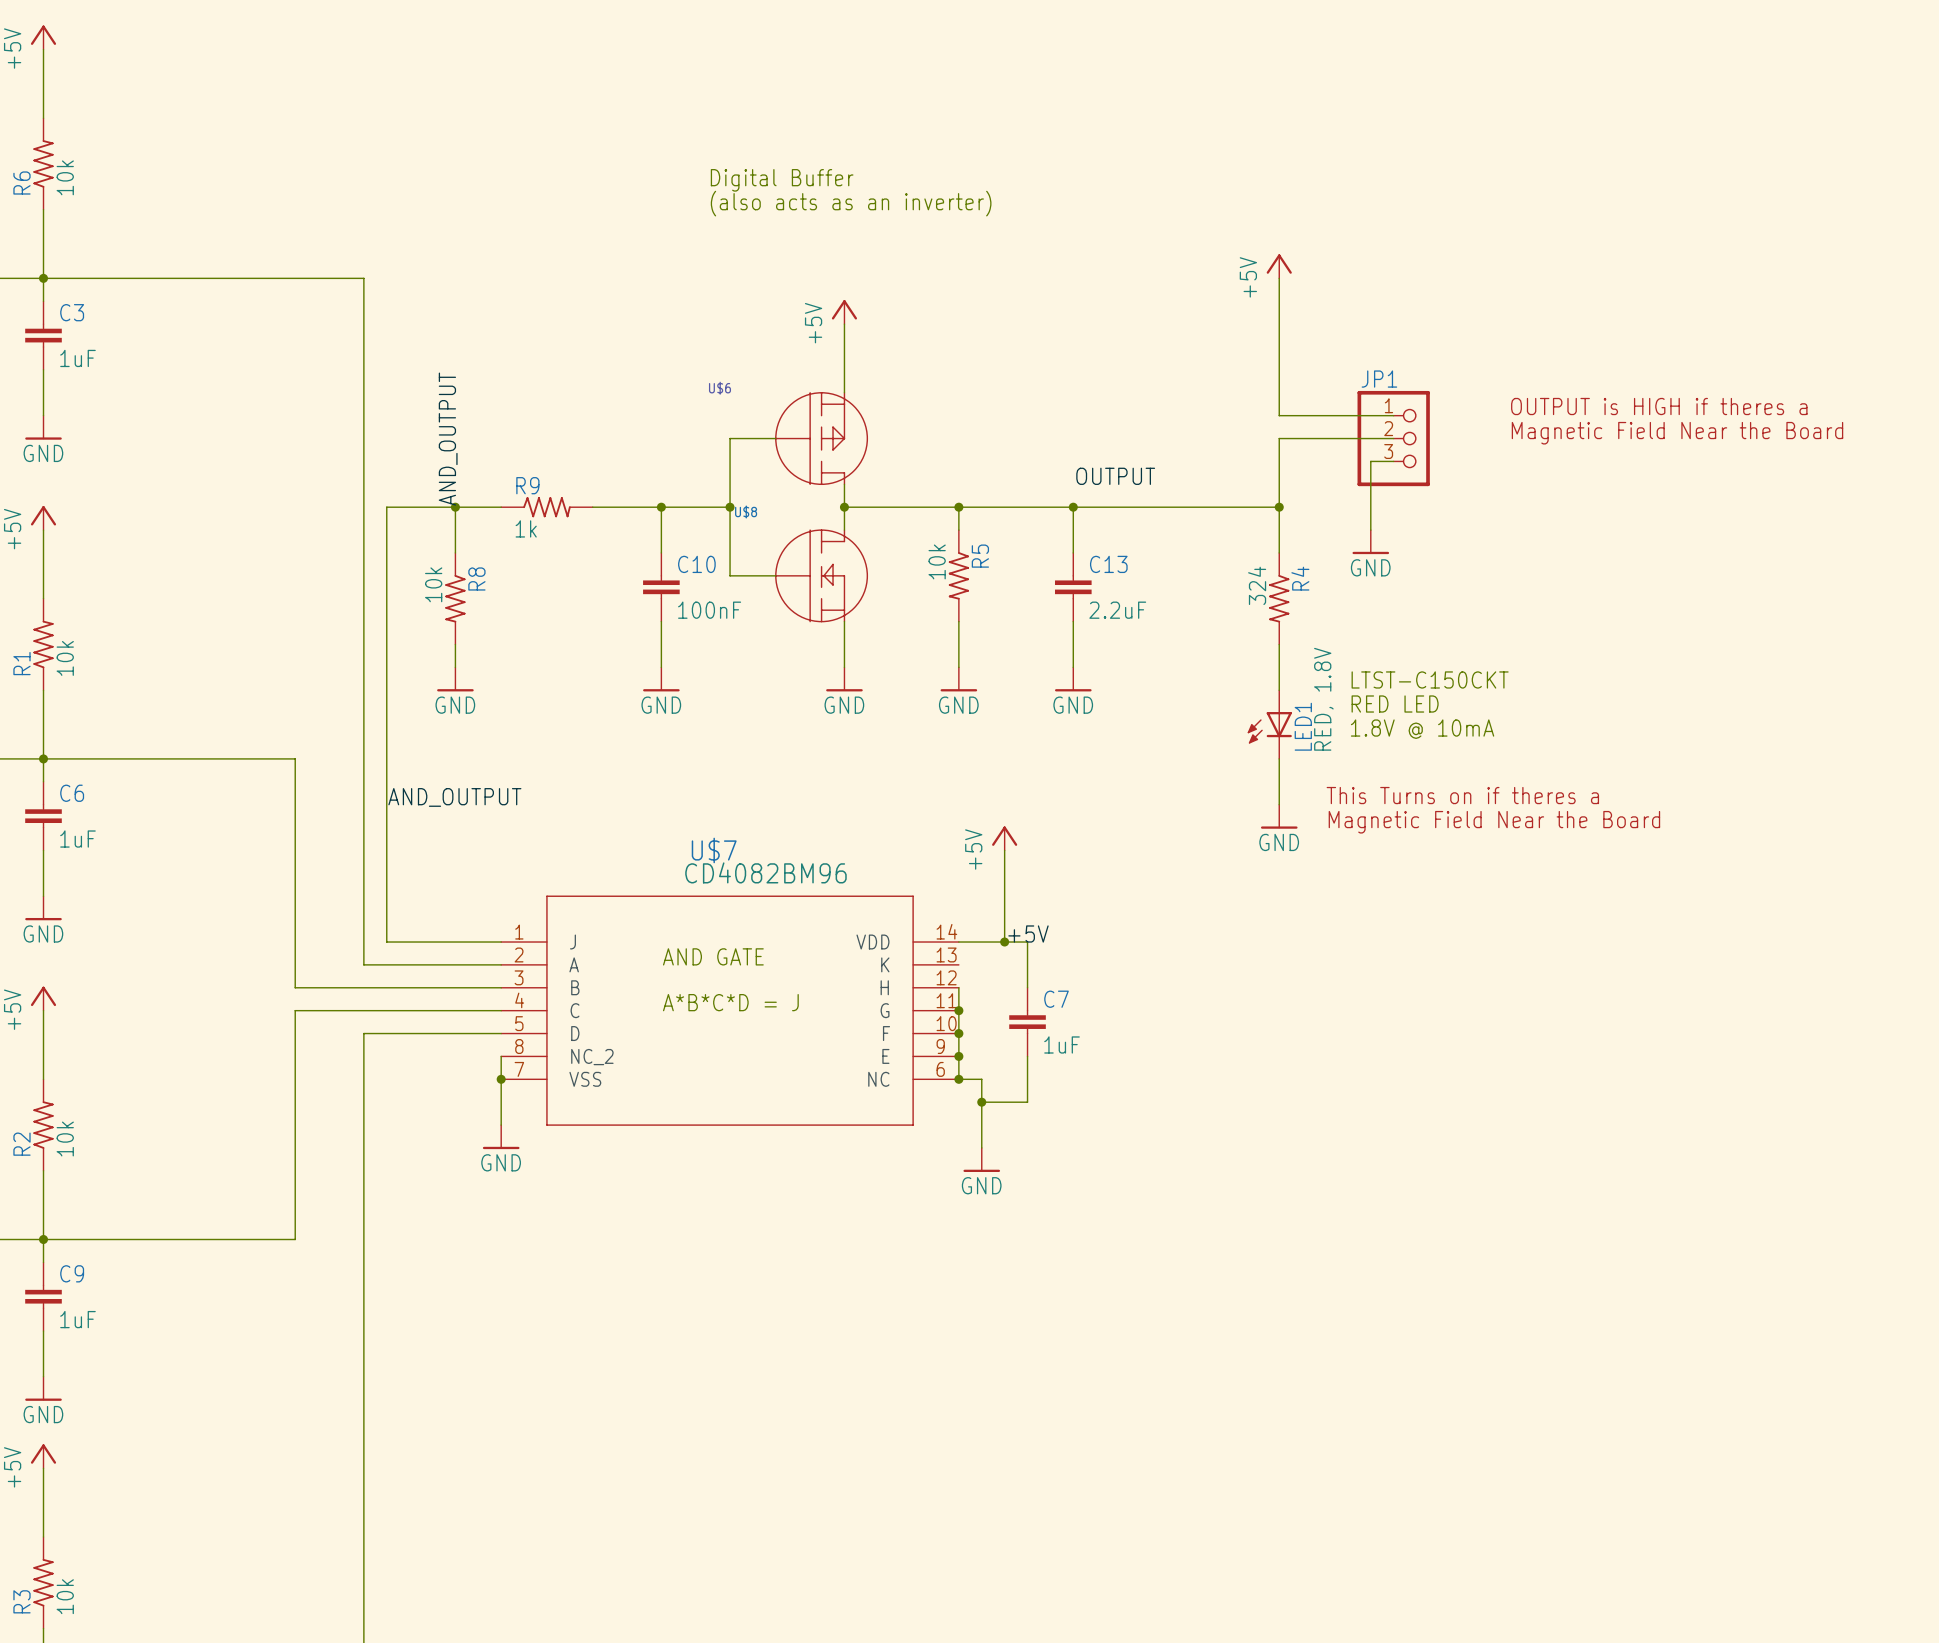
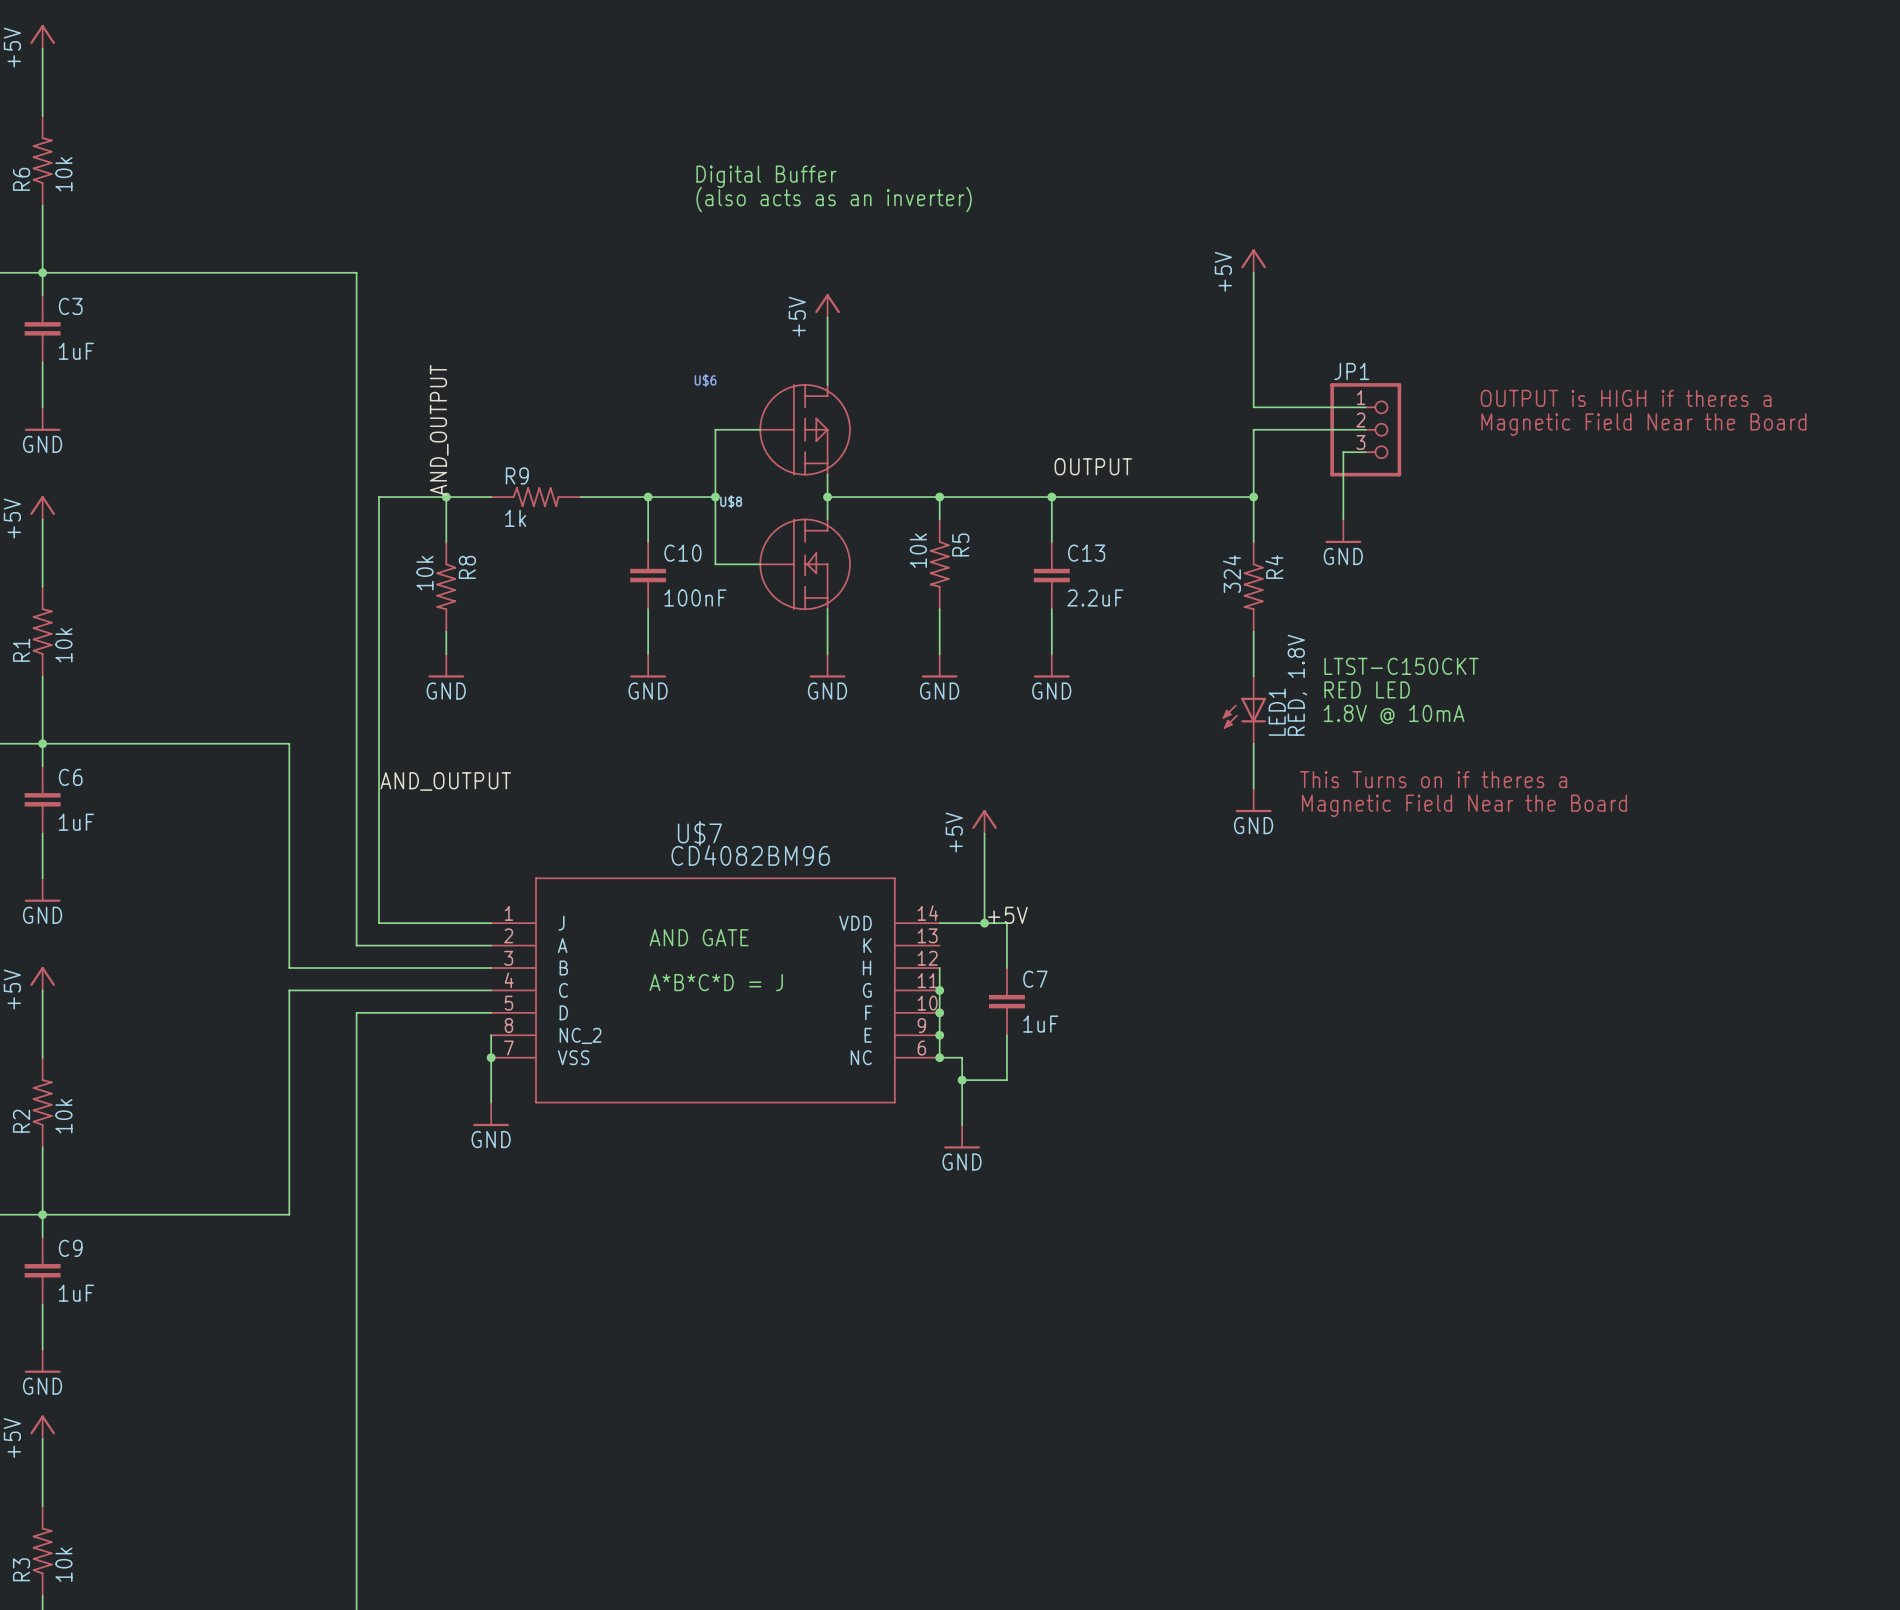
U$6 flip: as is (821, 438) -> up-down (805, 429)

